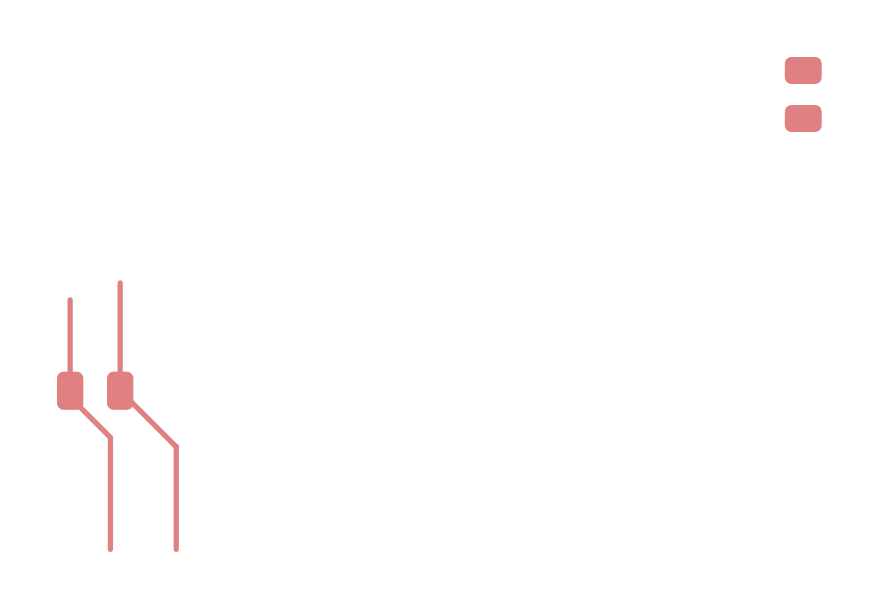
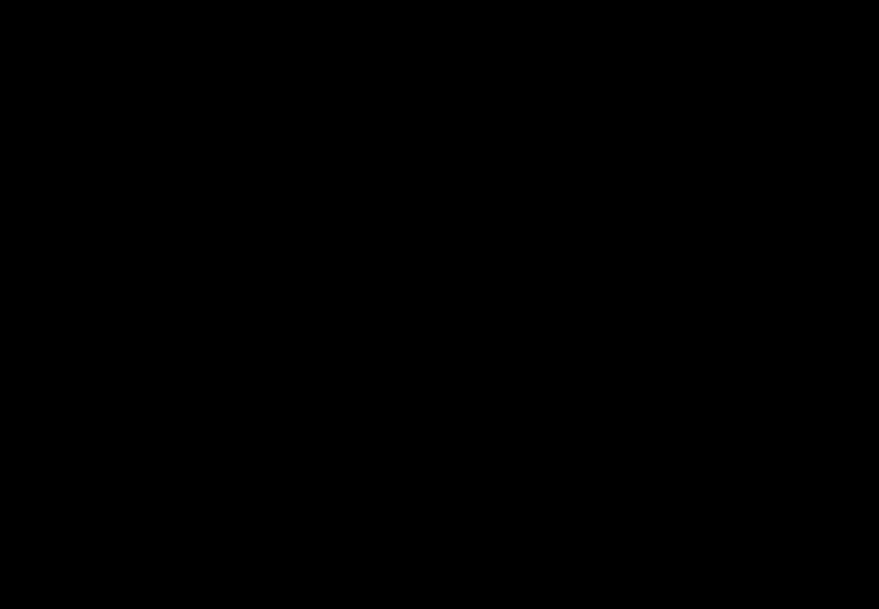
part: (803, 94) -> none
top track: (120, 282) (120, 390) (176, 446) (176, 549) -> none
top track: (70, 299) (70, 397) (110, 437) (110, 549) -> none
part: (95, 390) -> none

